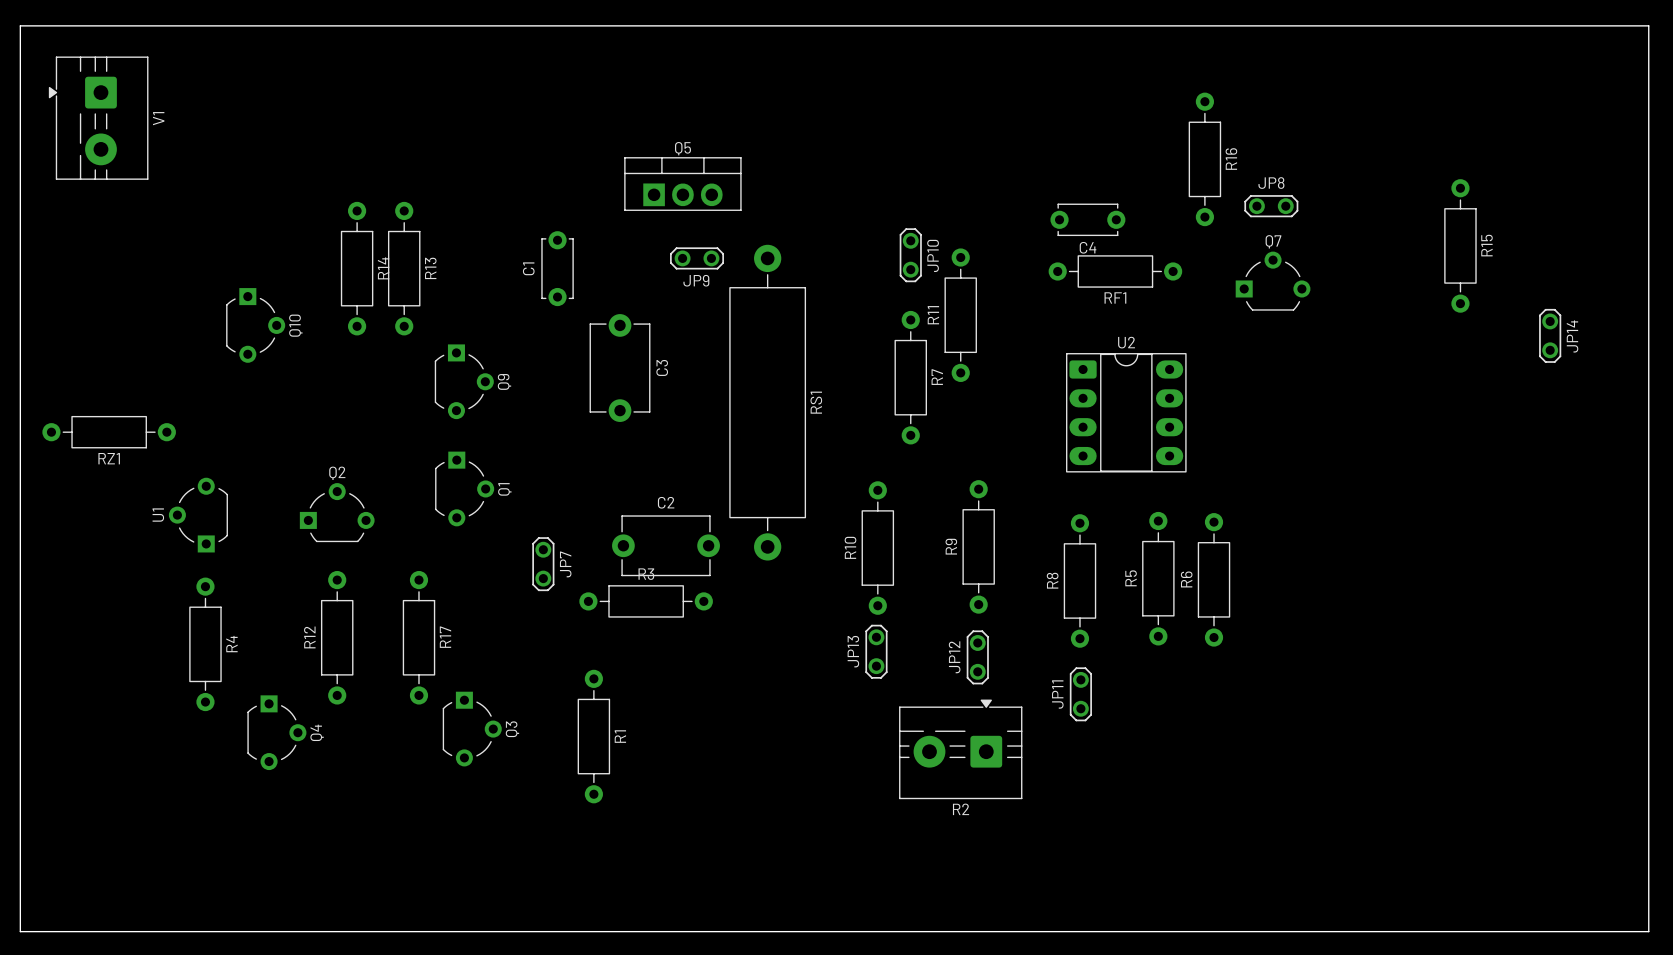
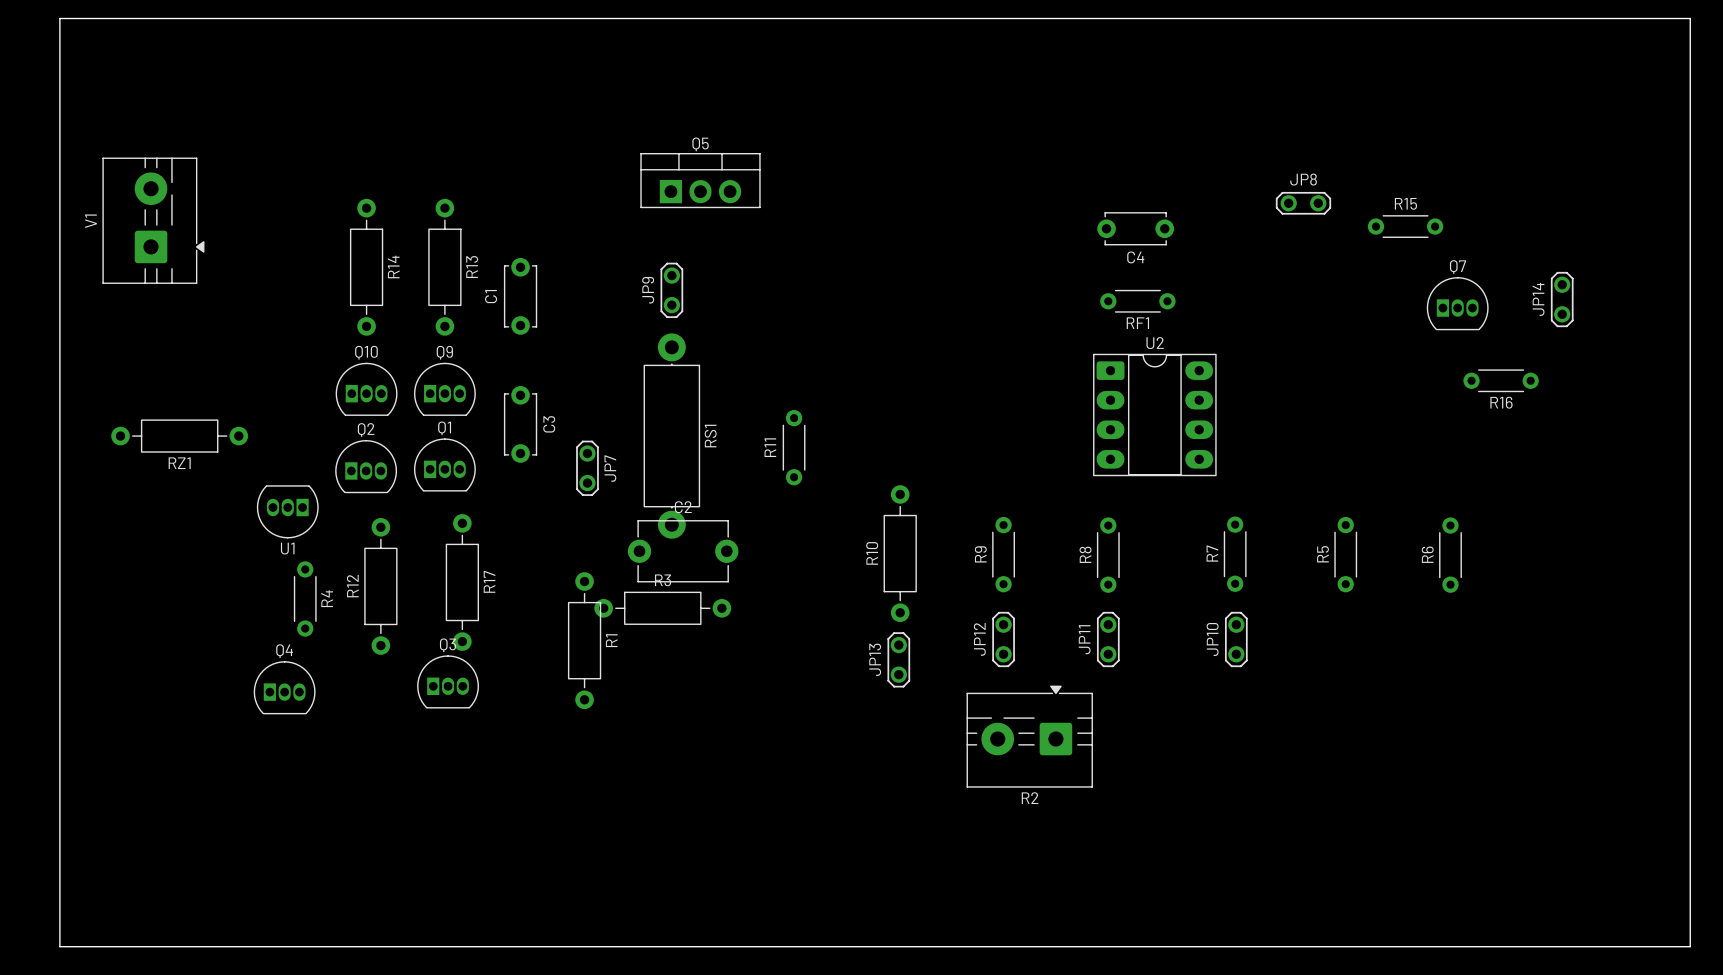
board edge: (57, 25) (20, 25) (20, 931) (57, 931) -> (59, 18) (59, 946)
R16 footprint: [1188, 92, 1222, 227] -> [1463, 369, 1539, 393]
V1 rotation: 0° (98, 118) -> 180° (153, 220)
V1 position: (98, 118) -> (153, 220)
R16 name position: R16 (1231, 159) -> R16 (1501, 402)
R15 footprint: [1444, 179, 1477, 313] -> [1367, 215, 1444, 238]
C4 position: (1087, 219) -> (1135, 228)
RS1 footprint: [729, 244, 807, 561] -> [643, 333, 701, 539]
R15 name position: R15 (1487, 245) -> R15 (1405, 203)
R11 footprint: [944, 248, 977, 382] -> [782, 409, 806, 486]
Q7 footprint: [1235, 251, 1311, 311] -> [1426, 277, 1489, 331]
JP10 position: (910, 255) -> (1236, 639)
JP10 name position: JP10 (933, 255) -> JP10 (1212, 639)
RF1 footprint: [1048, 255, 1183, 288] -> [1100, 289, 1176, 313]
JP9 rotation: 0° (697, 258) -> 90° clockwise (671, 290)
JP9 position: (697, 258) -> (671, 290)
R13 position: (404, 268) -> (444, 267)
C1 position: (557, 268) -> (520, 296)
Q10 footprint: [226, 288, 286, 363] -> [335, 362, 398, 416]
R7 footprint: [894, 310, 928, 445] -> [1223, 516, 1247, 592]
C3 footprint: [589, 314, 651, 422] -> [503, 386, 538, 463]
Q10 name position: Q10 (295, 325) -> Q10 (366, 352)
JP14 position: (1550, 335) -> (1562, 299)
JP14 name position: JP14 (1572, 336) -> JP14 (1538, 299)
Q9 footprint: [434, 344, 494, 420] -> [413, 362, 476, 416]
R7 name position: R7 (937, 377) -> R7 (1212, 553)
Q9 name position: Q9 (504, 381) -> Q9 (444, 352)
RZ1 position: (109, 432) -> (179, 436)
Q1 footprint: [435, 451, 495, 527] -> [413, 438, 476, 492]
U1 footprint: [168, 477, 228, 553] -> [256, 485, 319, 539]
R9 footprint: [962, 480, 995, 614] -> [992, 516, 1015, 593]
Q2 footprint: [299, 483, 375, 543] -> [335, 440, 398, 494]
Q1 name position: Q1 (504, 489) -> Q1 (444, 428)
R5 footprint: [1142, 511, 1175, 646] -> [1334, 516, 1358, 593]
R6 footprint: [1197, 513, 1231, 647] -> [1439, 517, 1462, 593]
R8 footprint: [1063, 514, 1097, 648] -> [1096, 517, 1120, 593]
U1 name position: U1 (158, 515) -> U1 (287, 548)
JP7 position: (543, 564) -> (587, 468)
R4 footprint: [189, 577, 222, 712] -> [293, 561, 317, 637]
R12 position: (337, 637) -> (380, 586)
R17 position: (418, 637) -> (462, 582)
JP12 position: (977, 657) -> (1003, 639)
Q3 footprint: [442, 691, 502, 767] -> [417, 655, 480, 709]
JP11 position: (1080, 694) -> (1108, 639)
Q4 footprint: [247, 695, 307, 771] -> [253, 661, 316, 715]
Q3 name position: Q3 (512, 729) -> Q3 (447, 645)
Q4 name position: Q4 (317, 732) -> Q4 (284, 651)
R1 position: (593, 736) -> (584, 640)
R2 position: (960, 749) -> (1029, 736)

